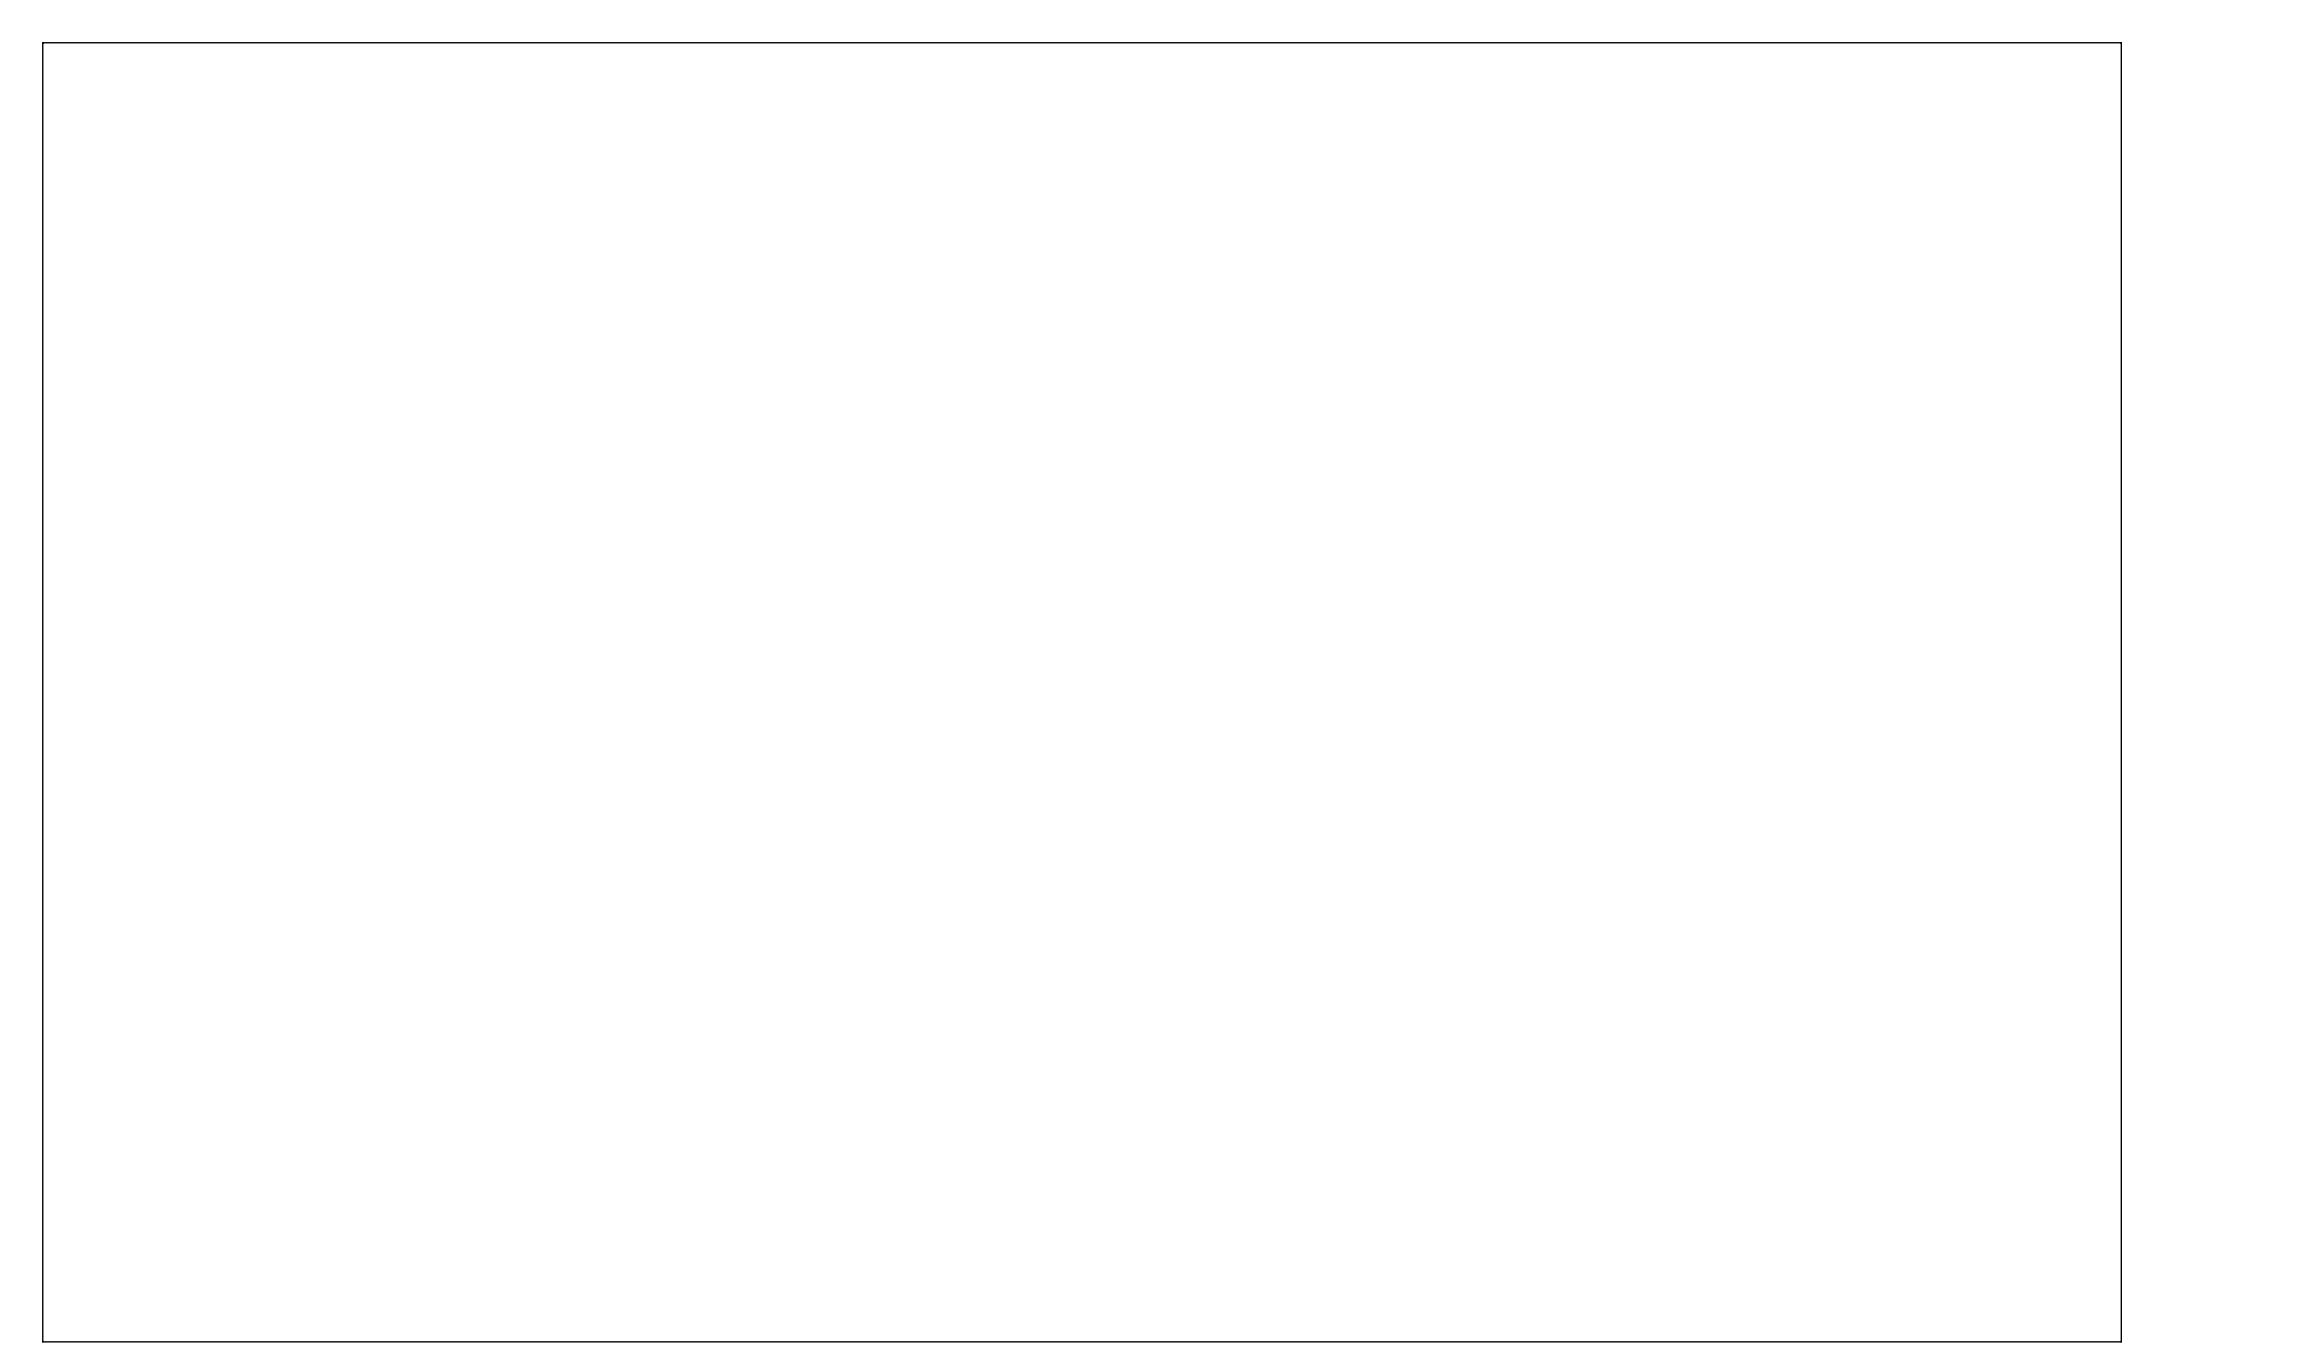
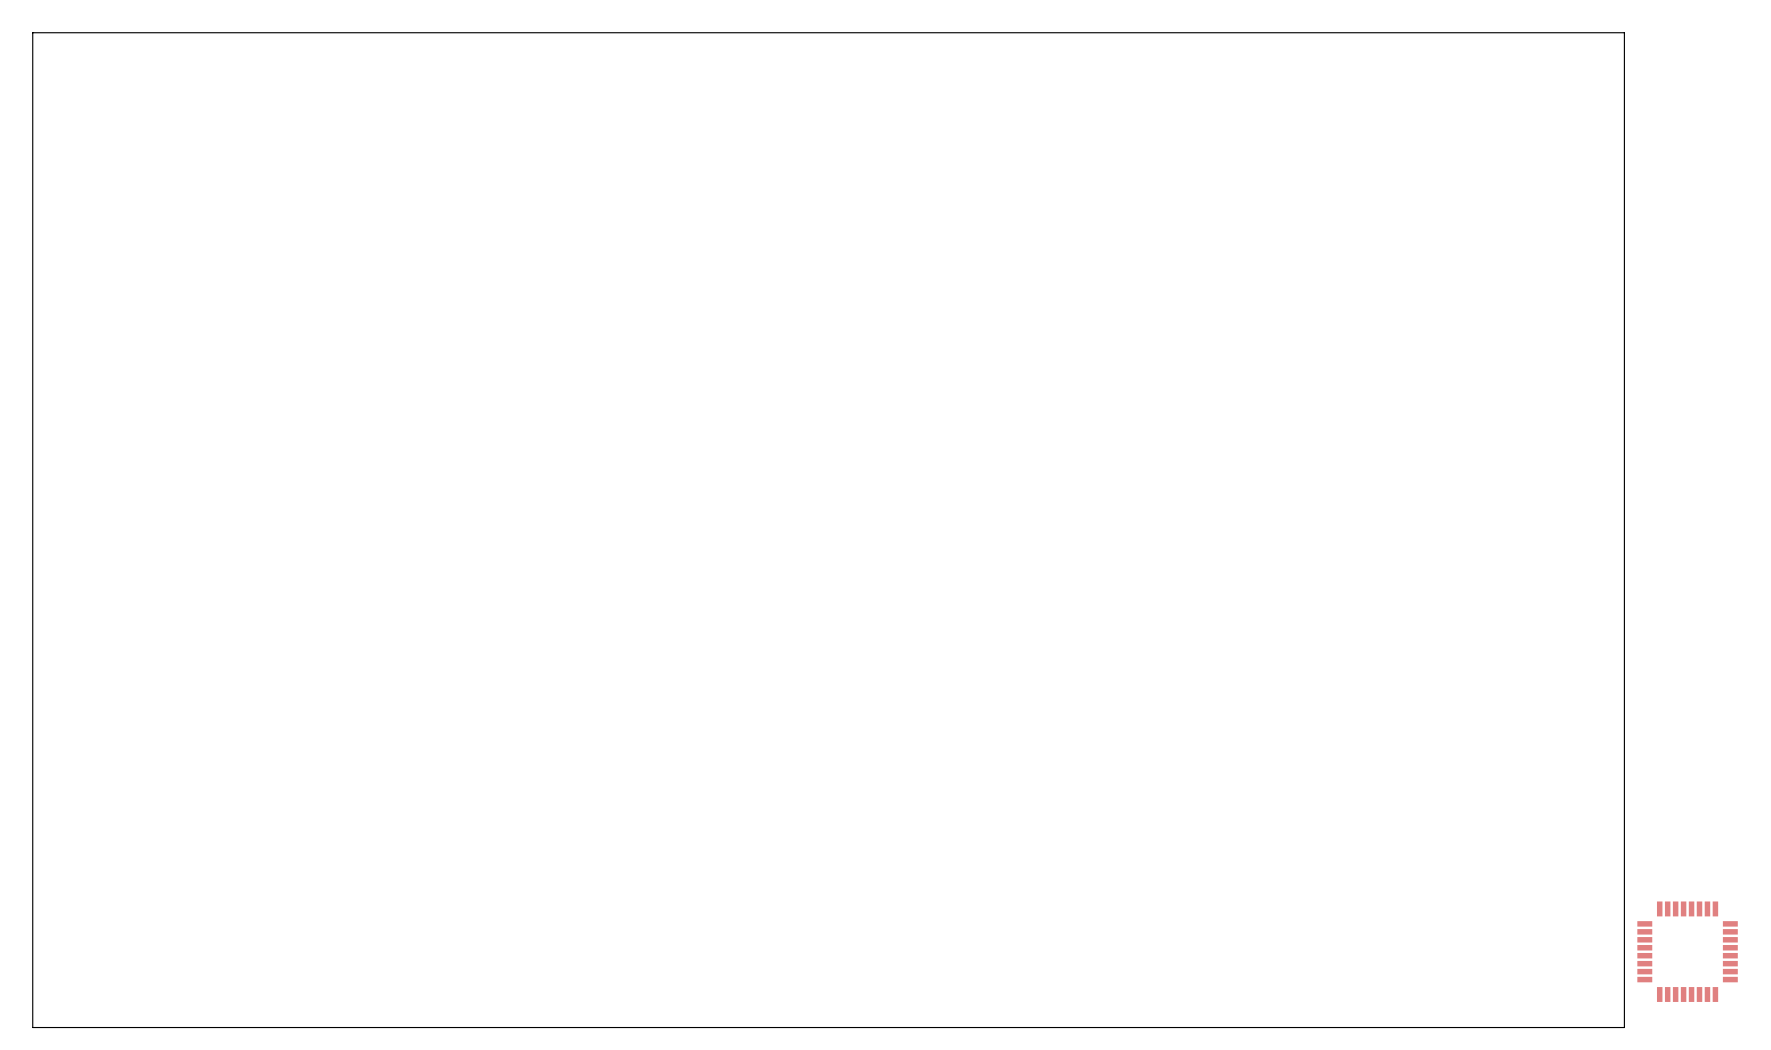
part: none -> (1687, 951)

